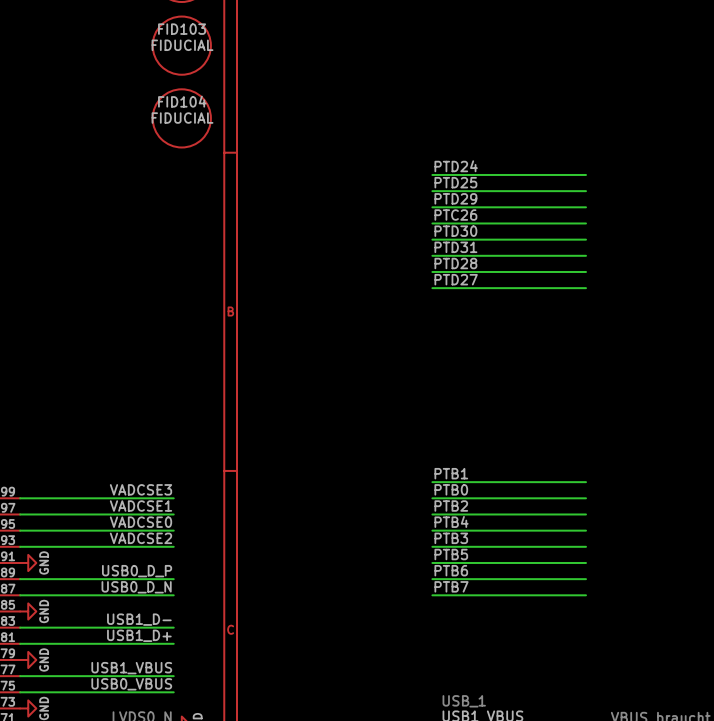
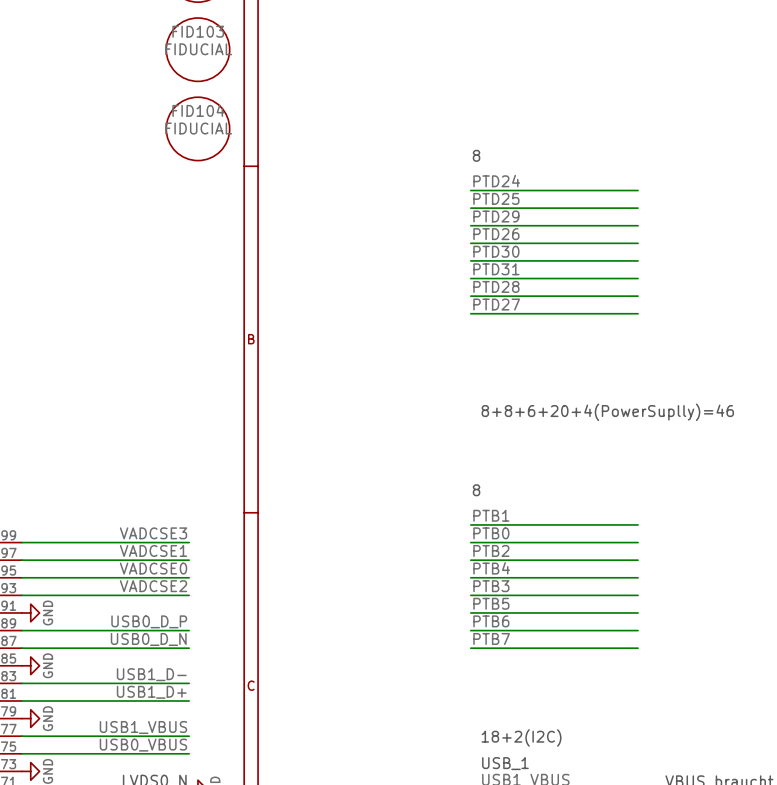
text: none -> 8 (476, 155)
label: PTC26 (455, 215) -> PTD26 (496, 234)
text: none -> 8+8+6+20+4(PowerSuplly)=46 (607, 412)
text: none -> 8 (476, 490)
text: none -> 18+2(I2C) (521, 737)

